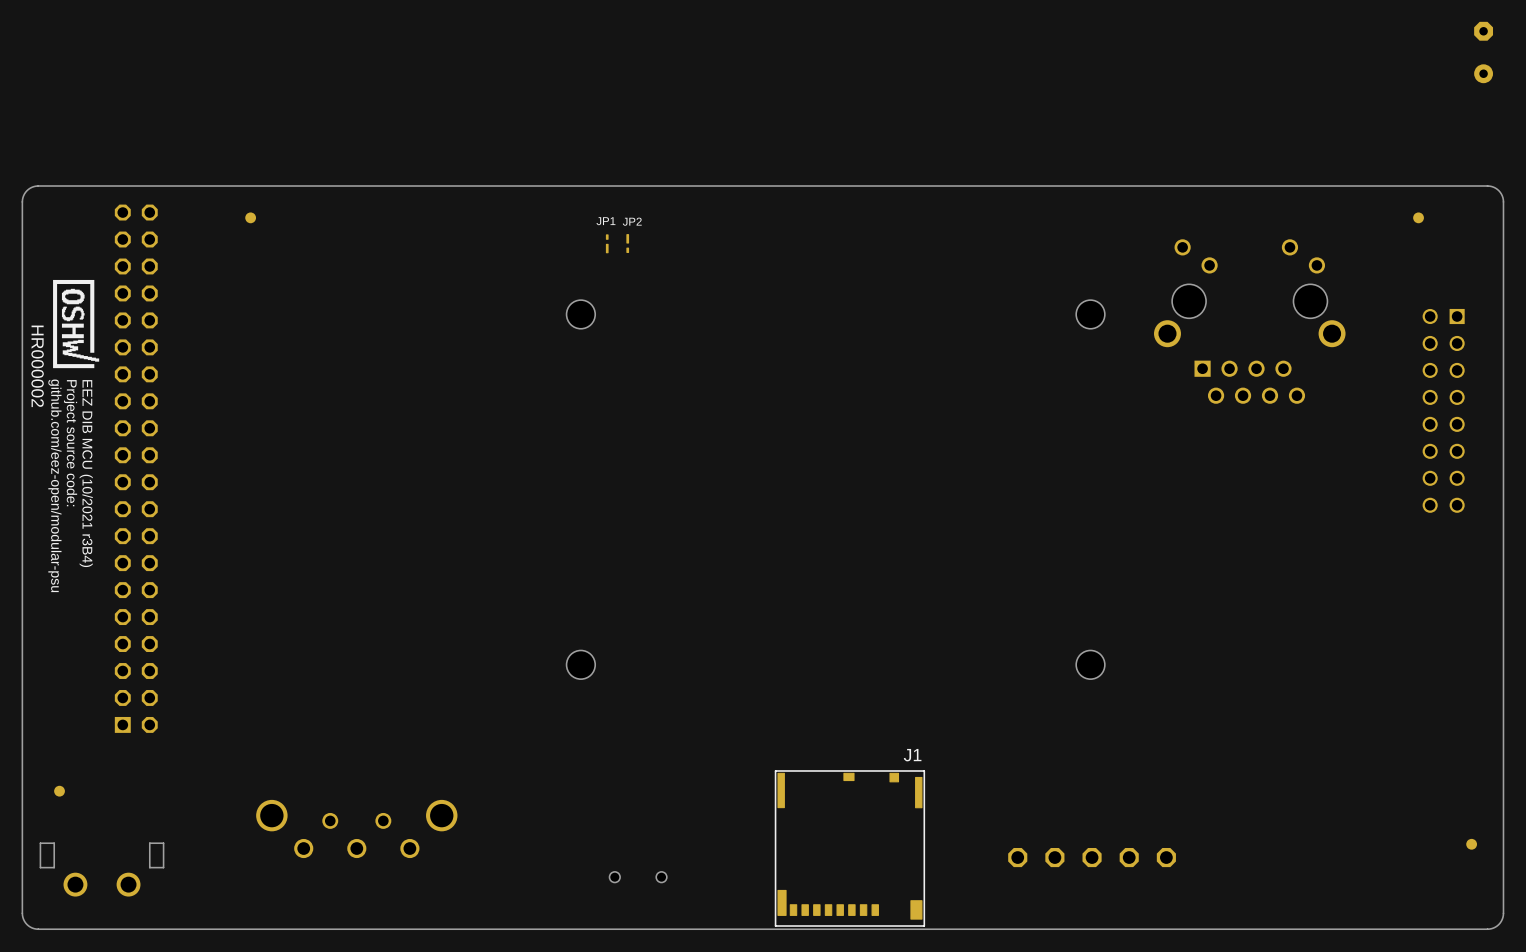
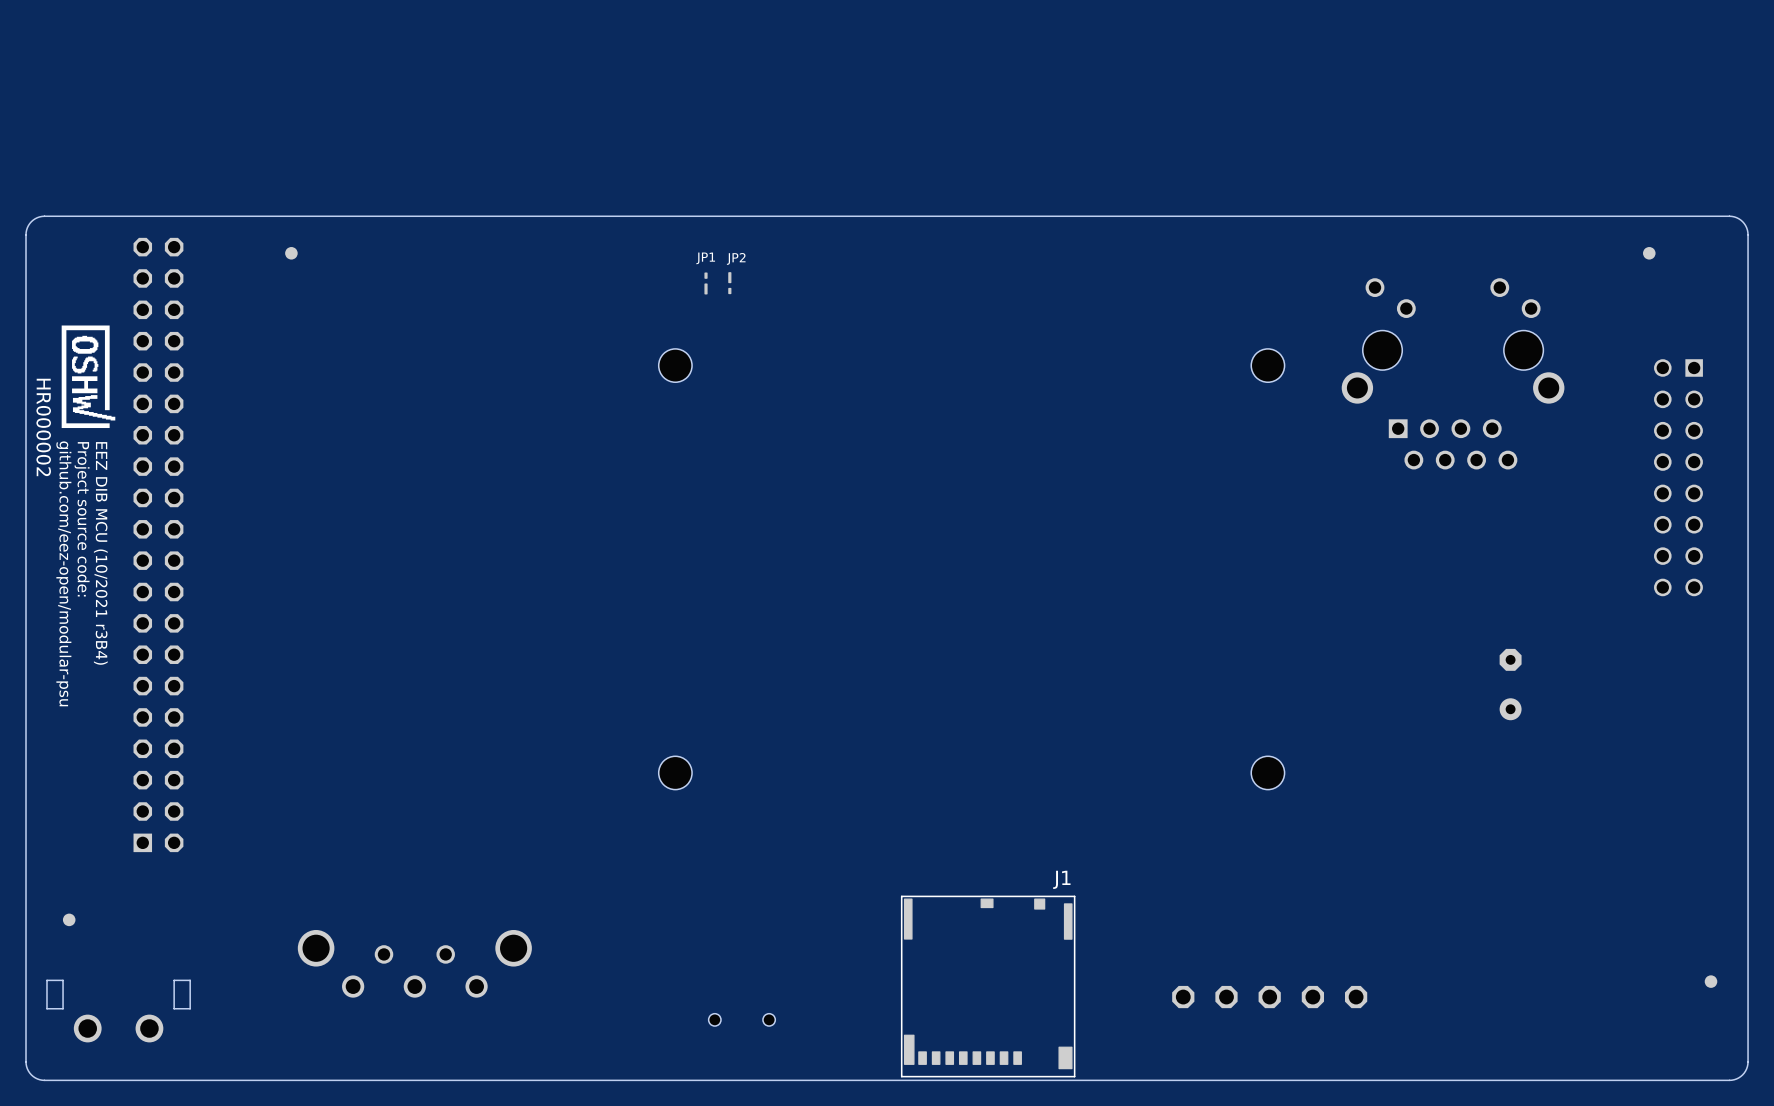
part: (1483, 52) -> none
part: none -> (1510, 684)

